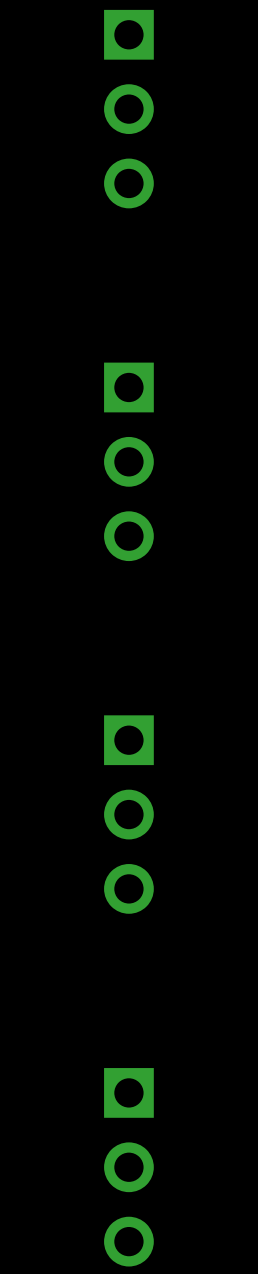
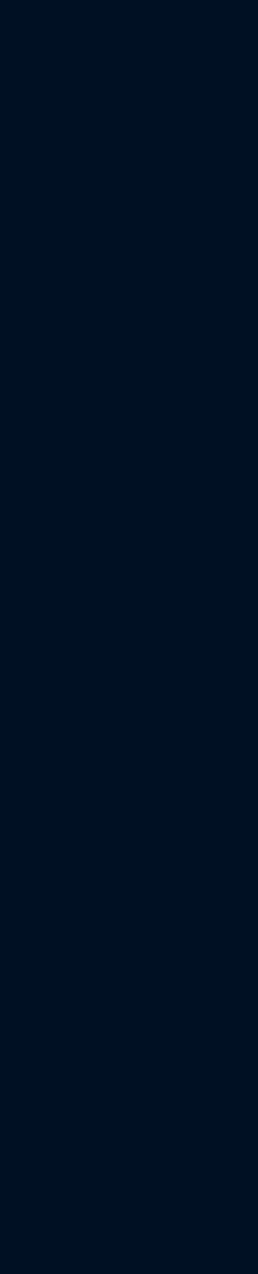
part: (128, 109) -> none
part: (128, 461) -> none
part: (128, 814) -> none
part: (128, 1167) -> none

